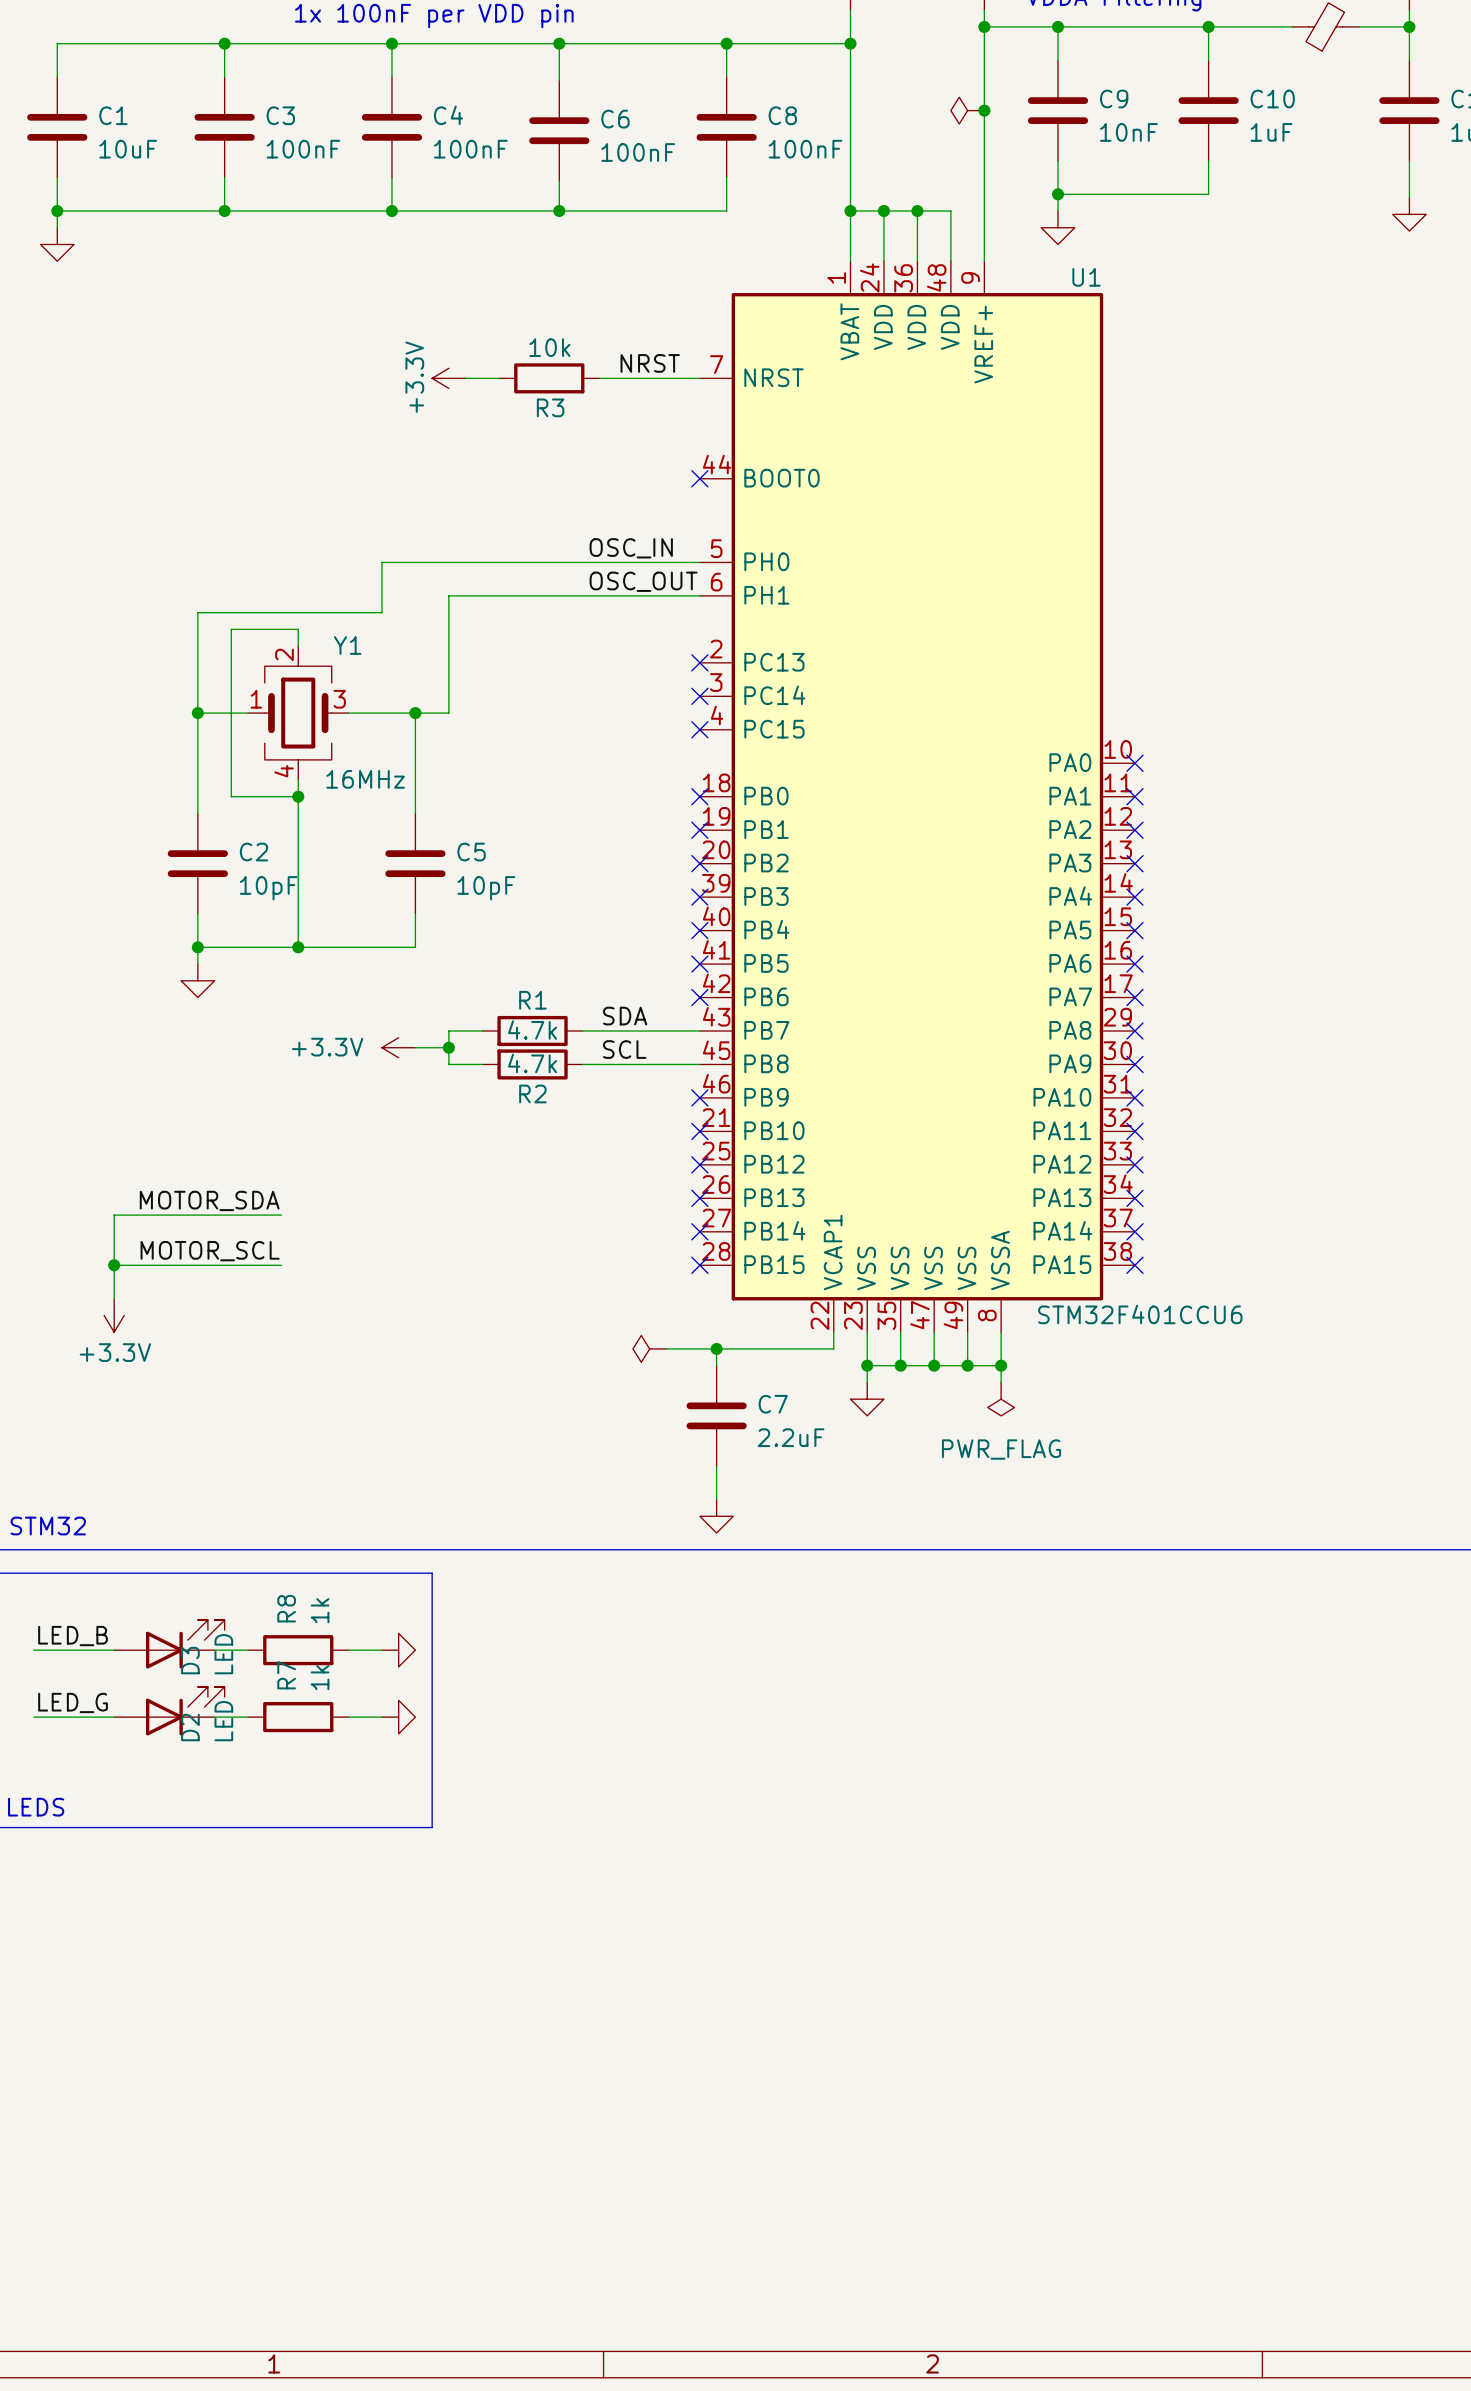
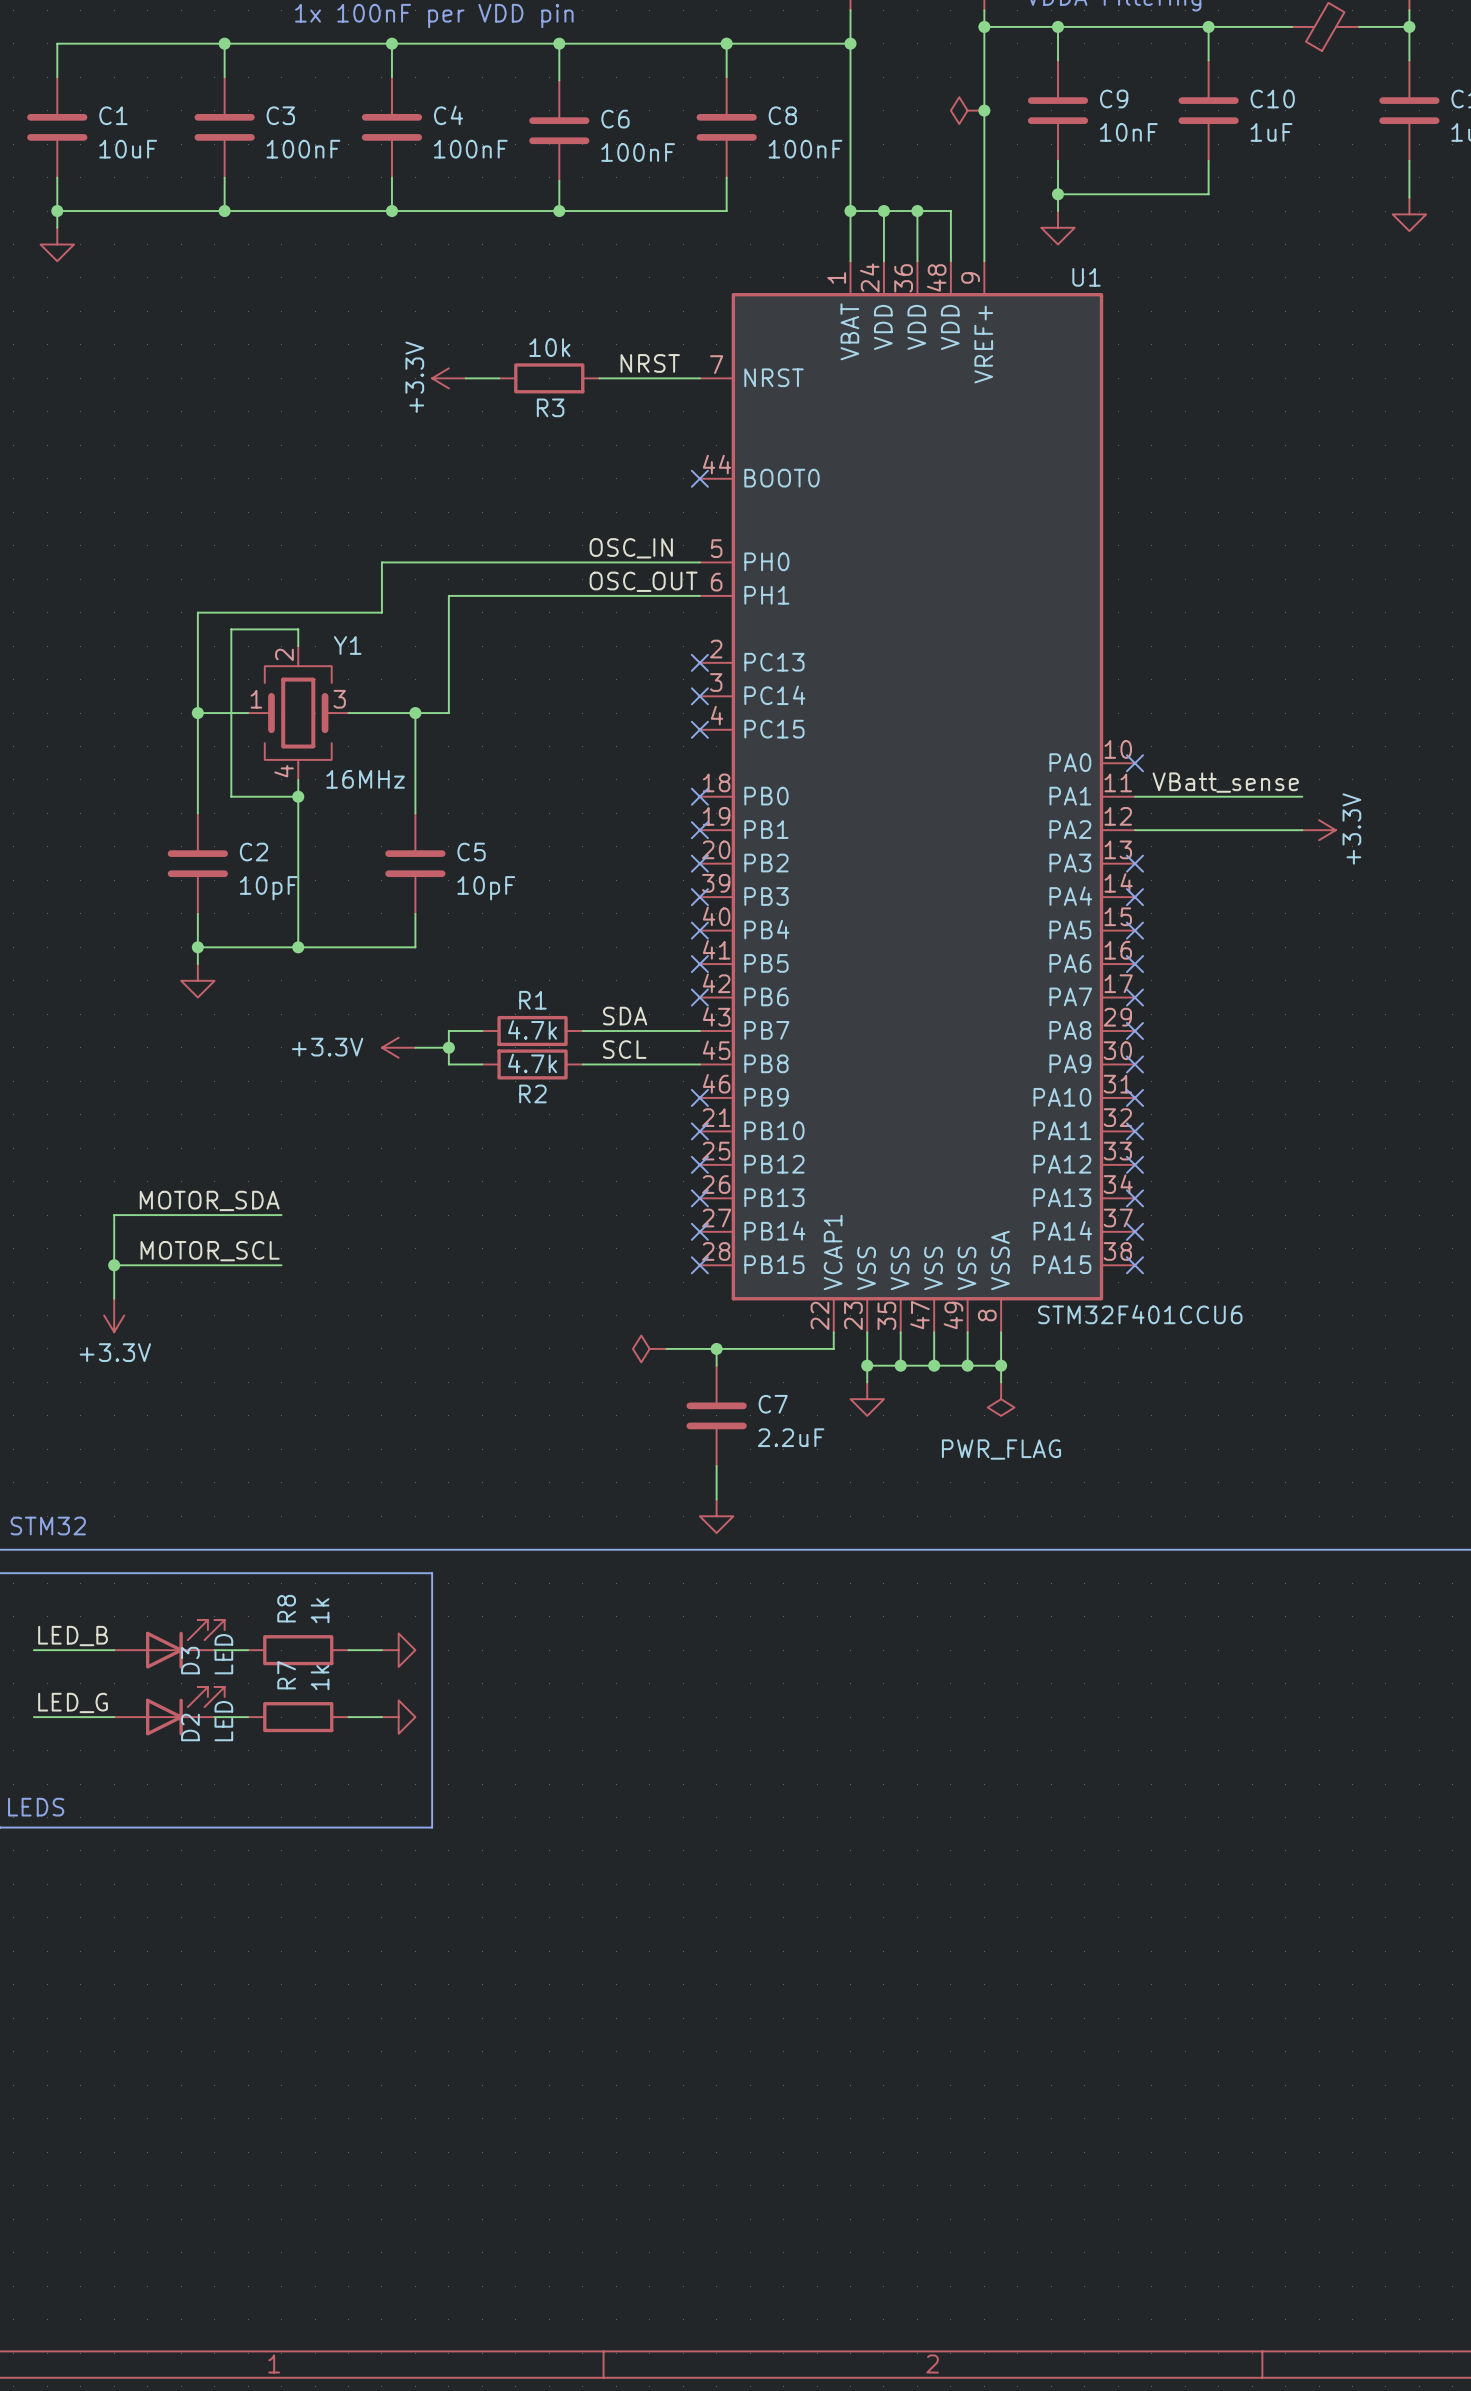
label: none -> VBatt_sense (1225, 782)
wire: none -> (1134, 796) (1302, 796)
no-connect mark: (1134, 796) -> none
wire: none -> (1134, 830) (1302, 830)
no-connect mark: (1134, 830) -> none
power symbol: none -> +3.3V (1319, 830)

